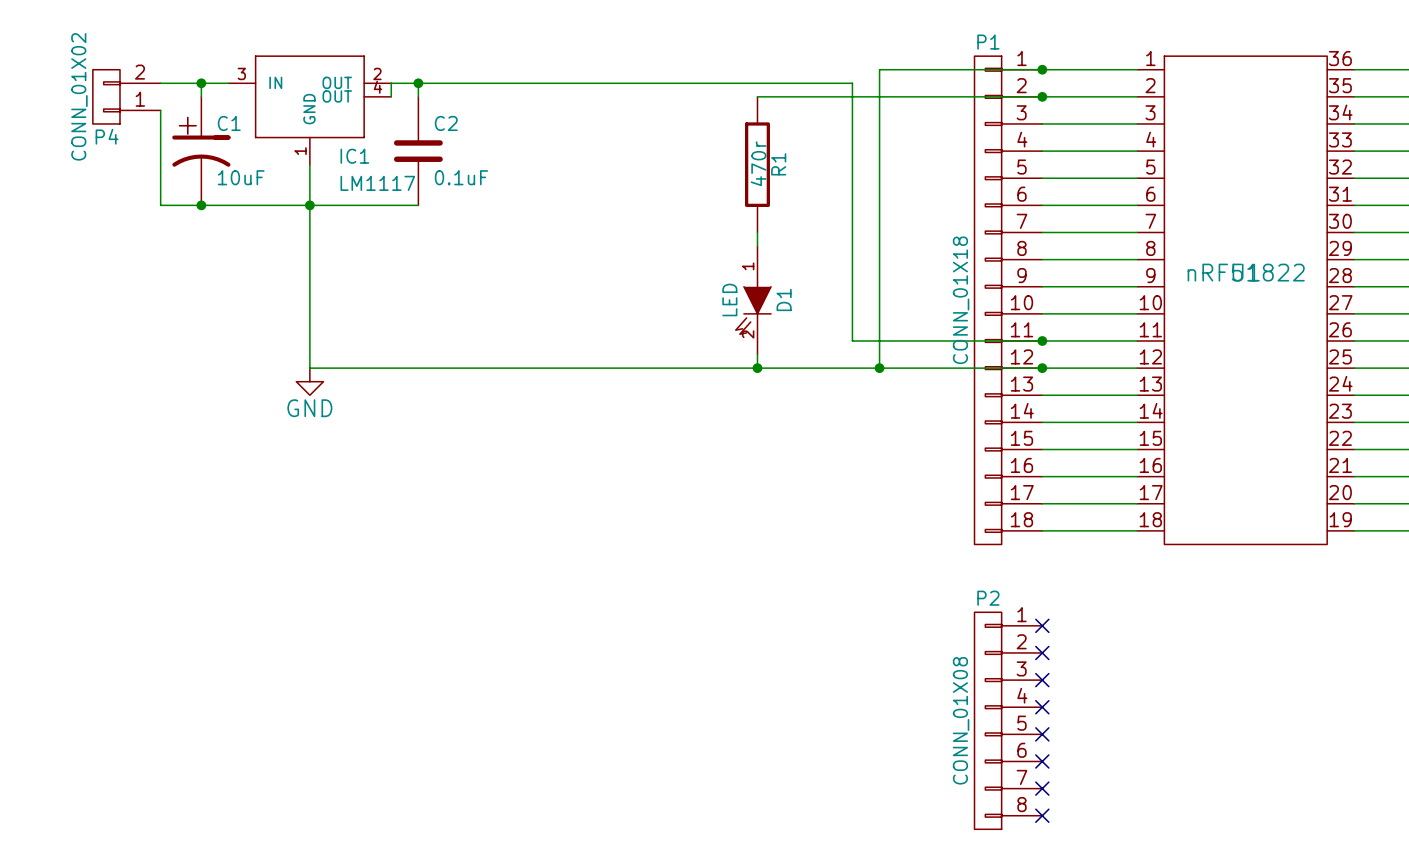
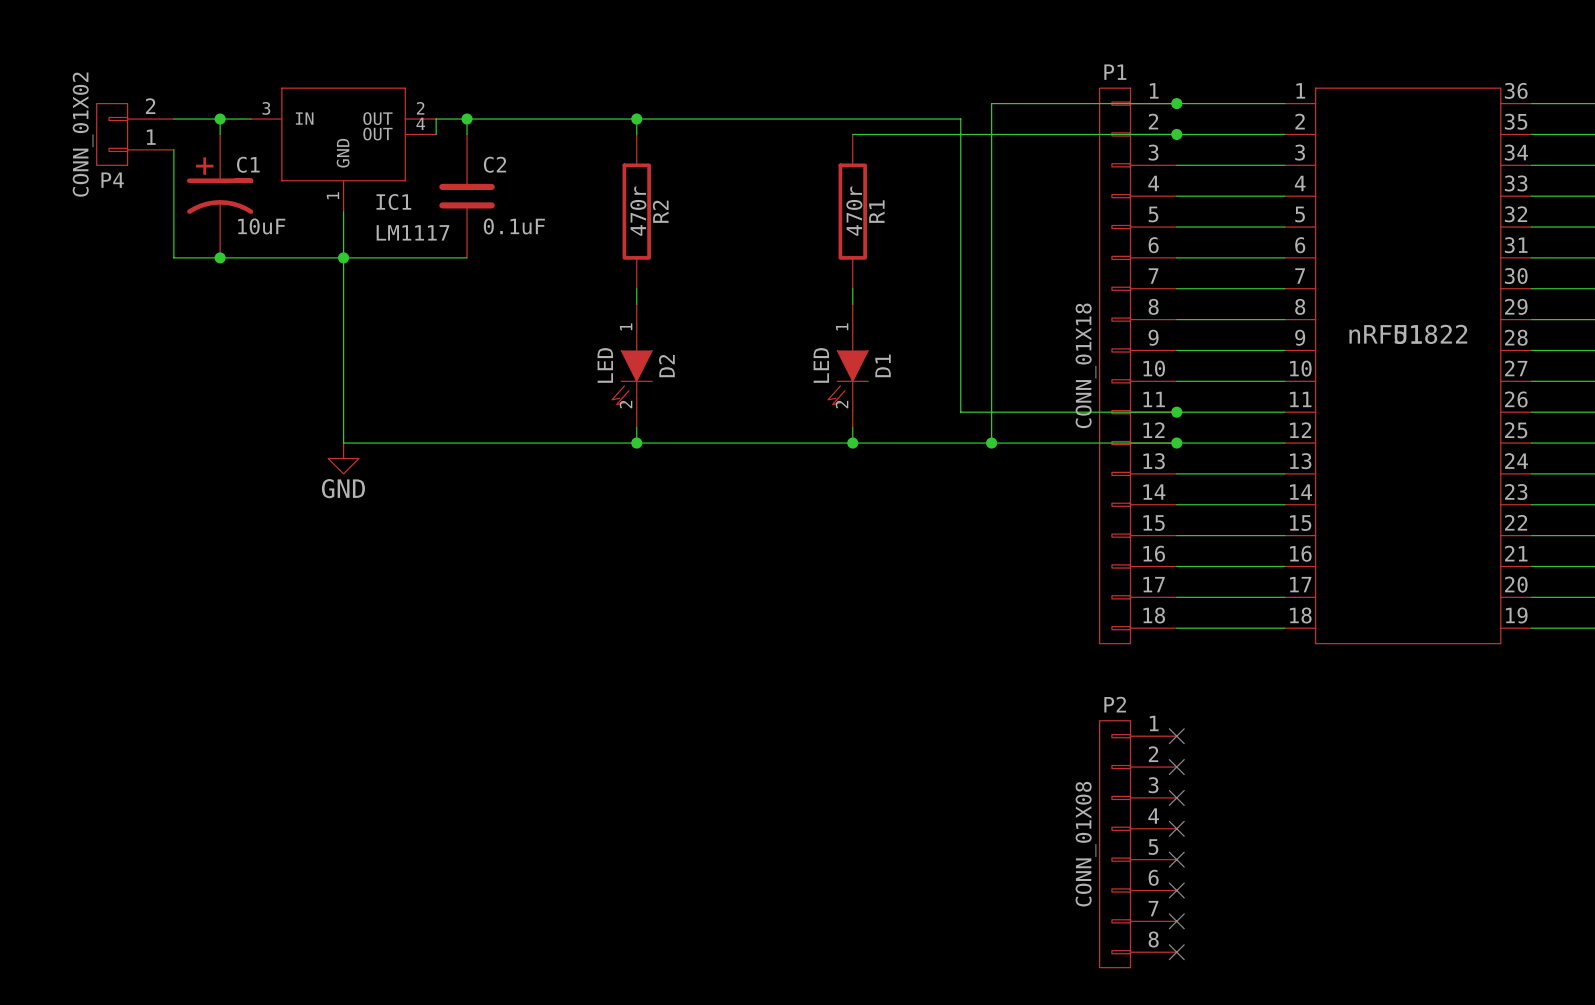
wire: none -> (636, 119) (636, 134)
junction: none -> (636, 119)
R2: none -> 470r (636, 211)
wire: none -> (636, 288) (636, 304)
D2: none -> LED (632, 365)
wire: none -> (636, 427) (636, 443)
junction: none -> (636, 443)

